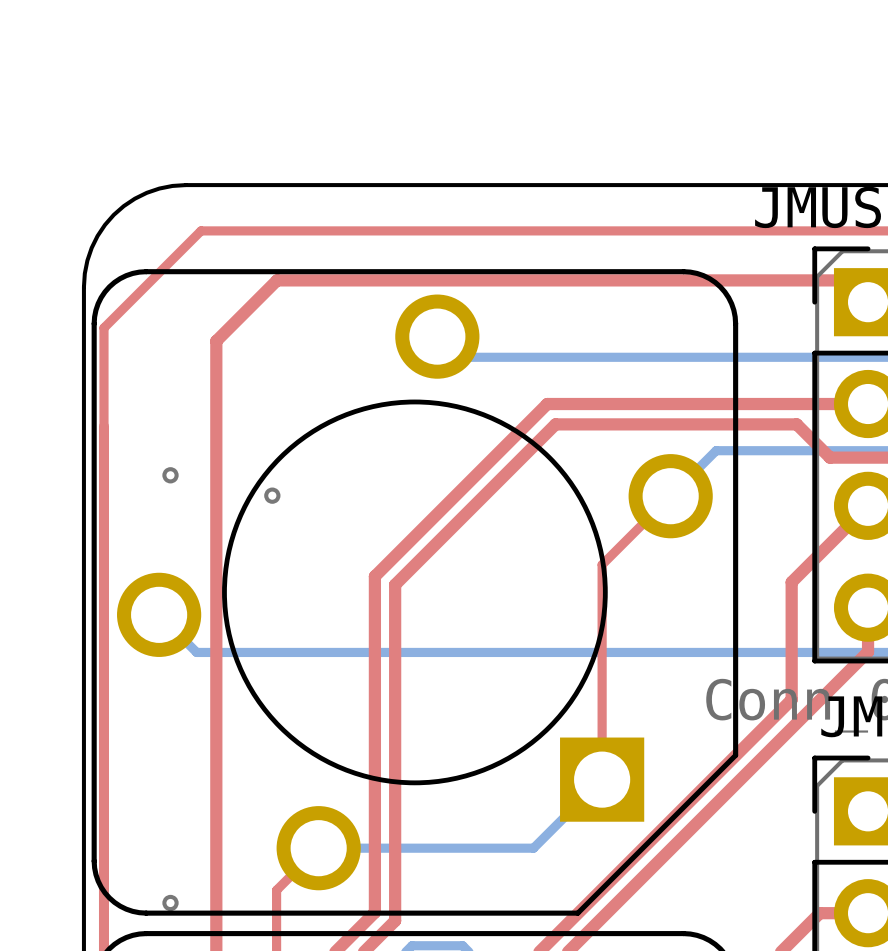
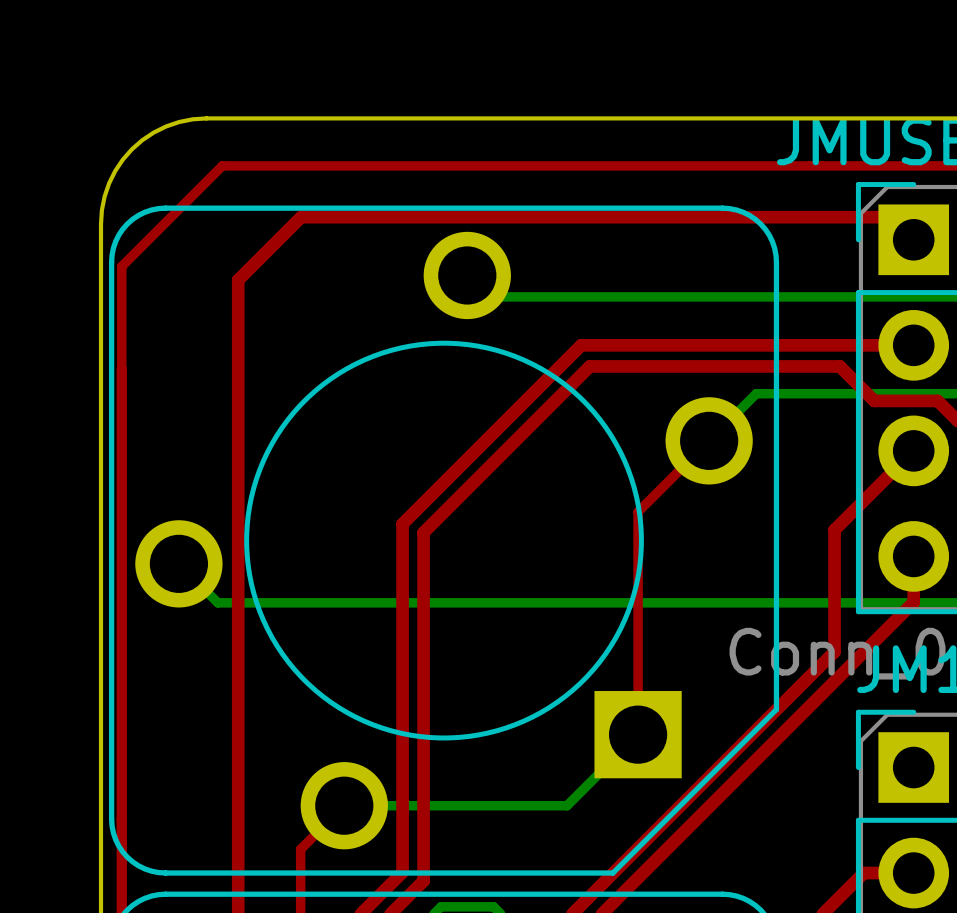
via: (170, 475) -> none
via: (272, 495) -> none
via: (170, 902) -> none

